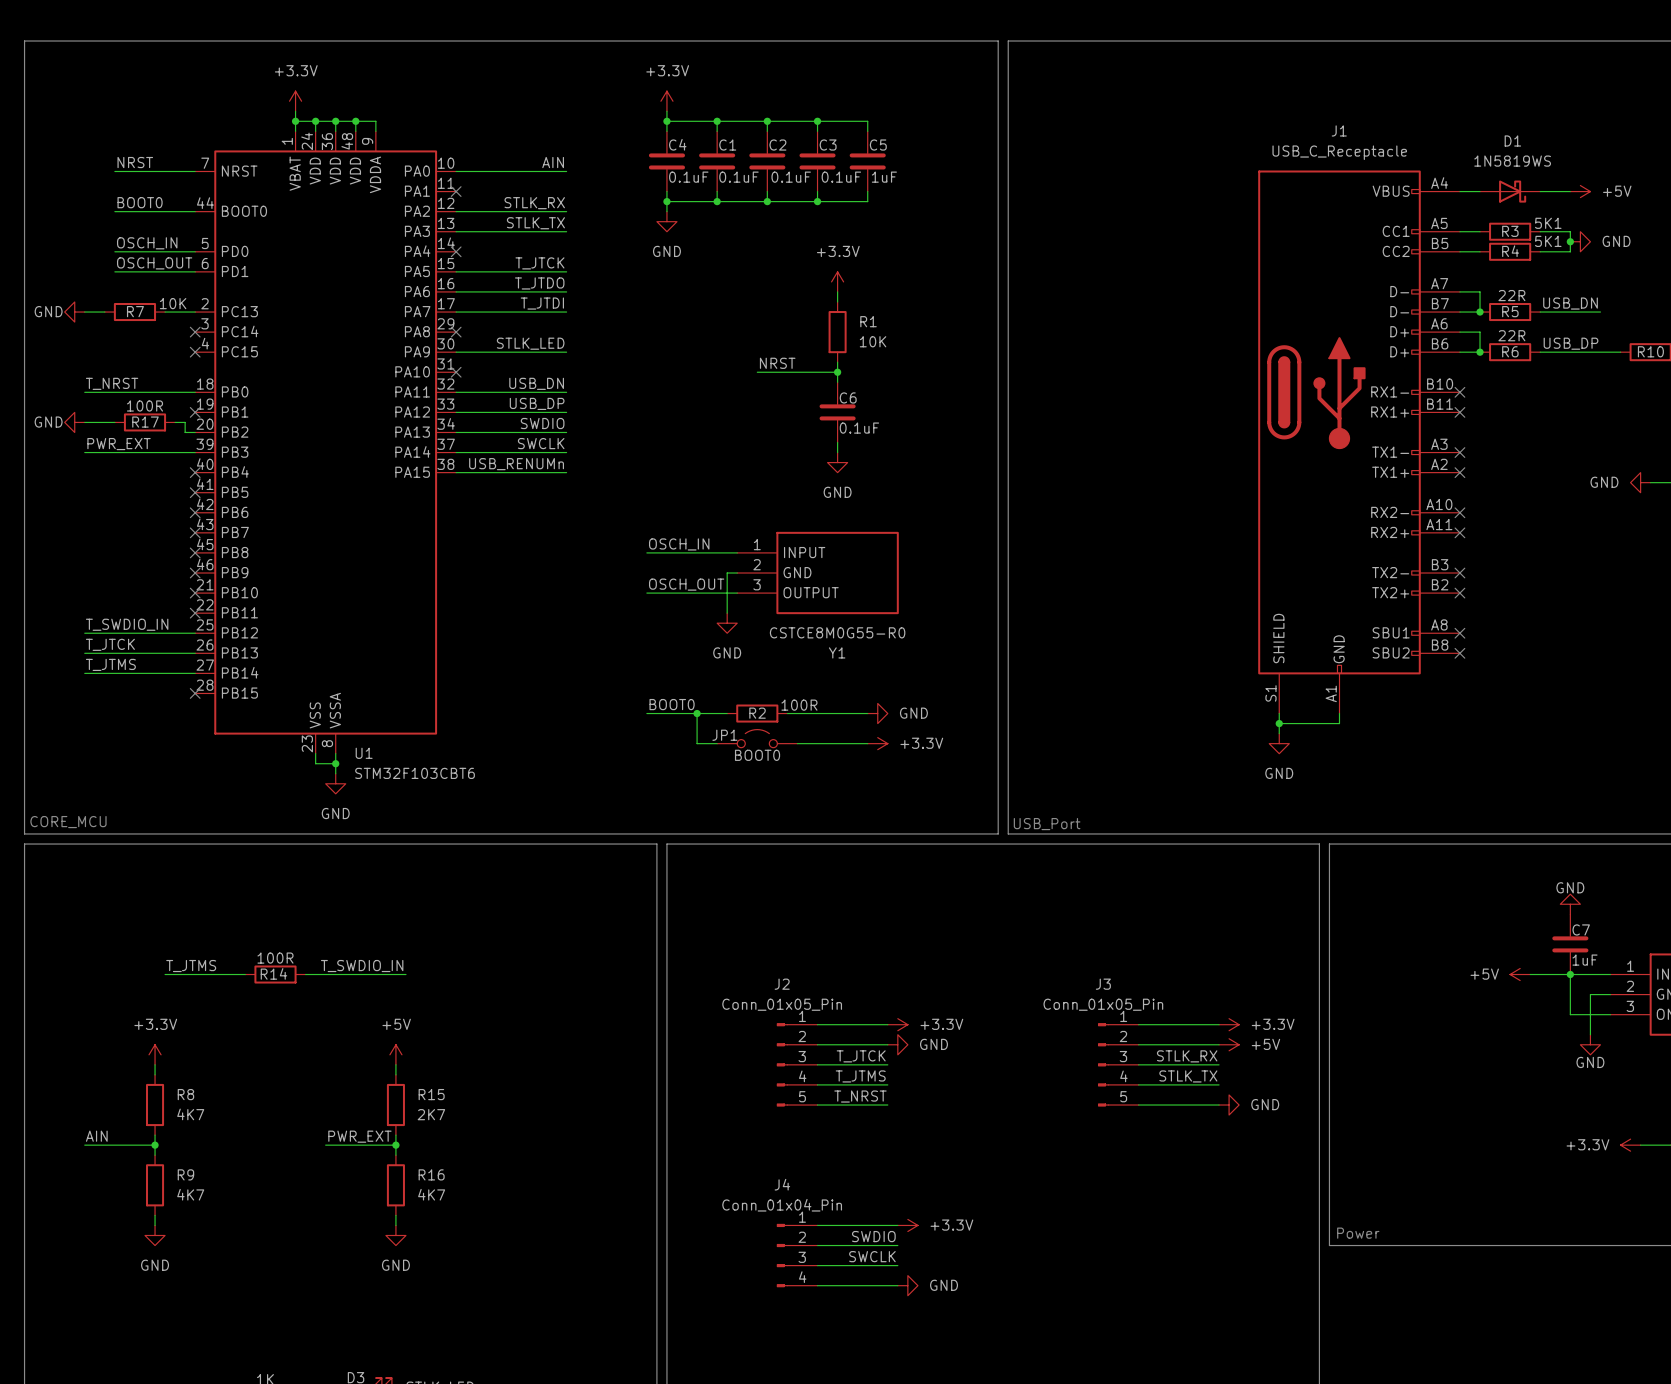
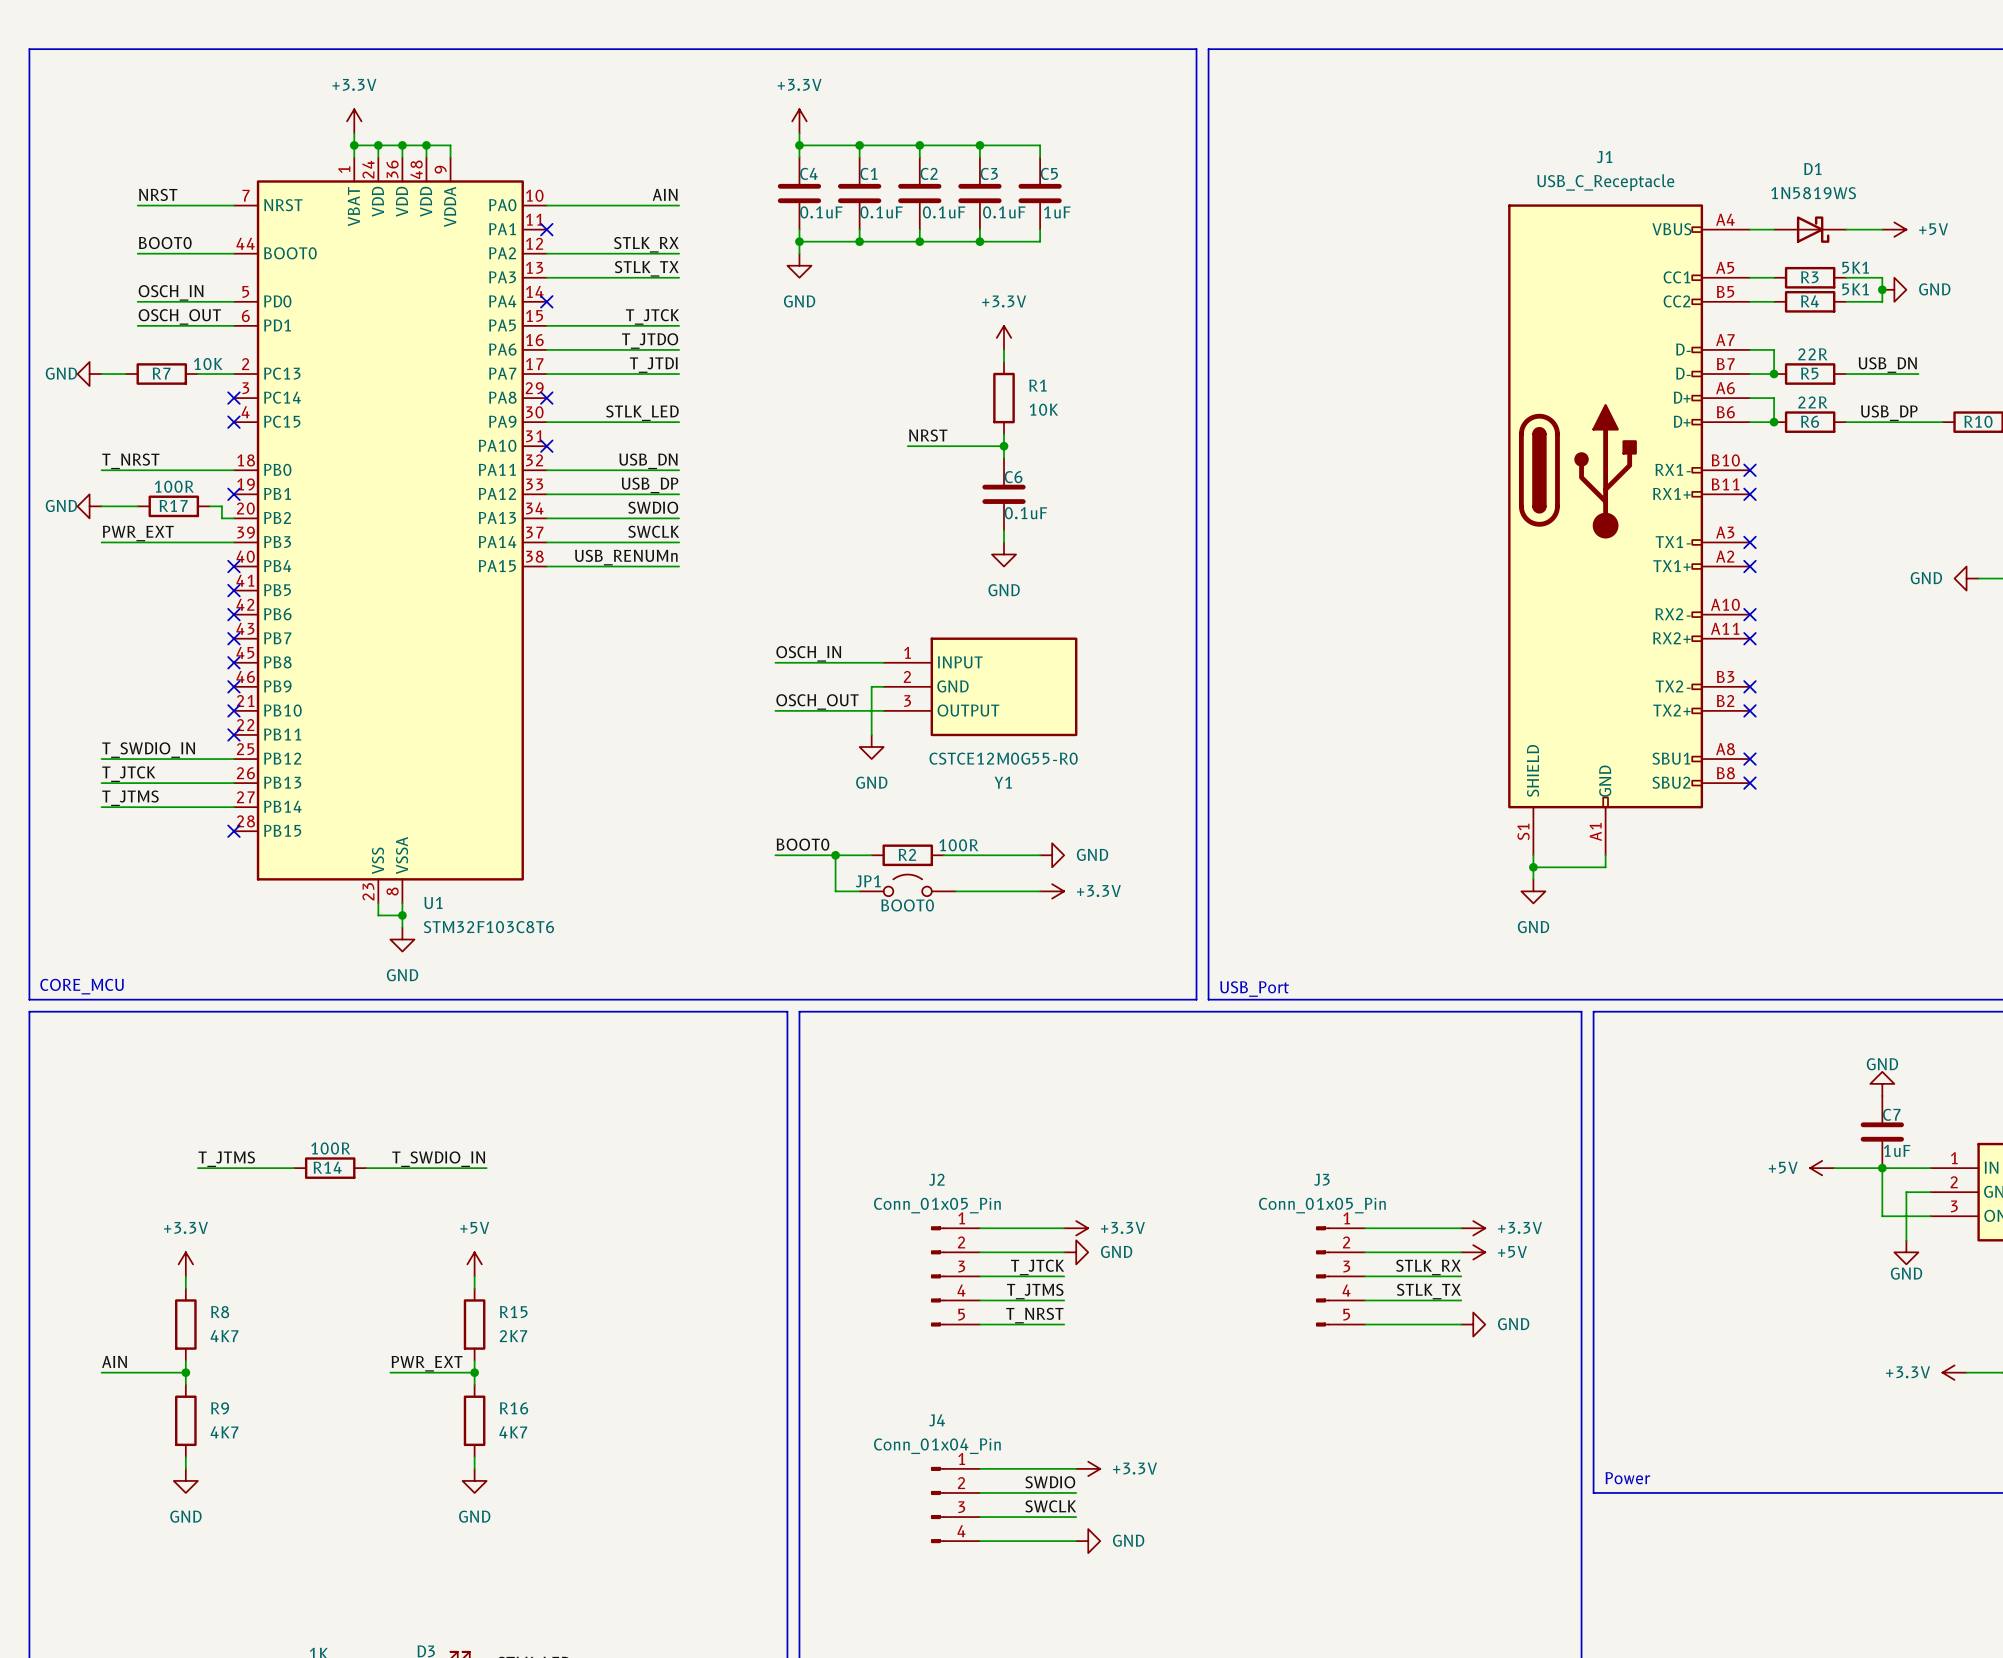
Y1 value: CSTCE8M0G55-R0 (837, 632) -> CSTCE12M0G55-R0 (1003, 758)
U1 value: STM32F103CBT6 (415, 773) -> STM32F103C8T6 (488, 927)

